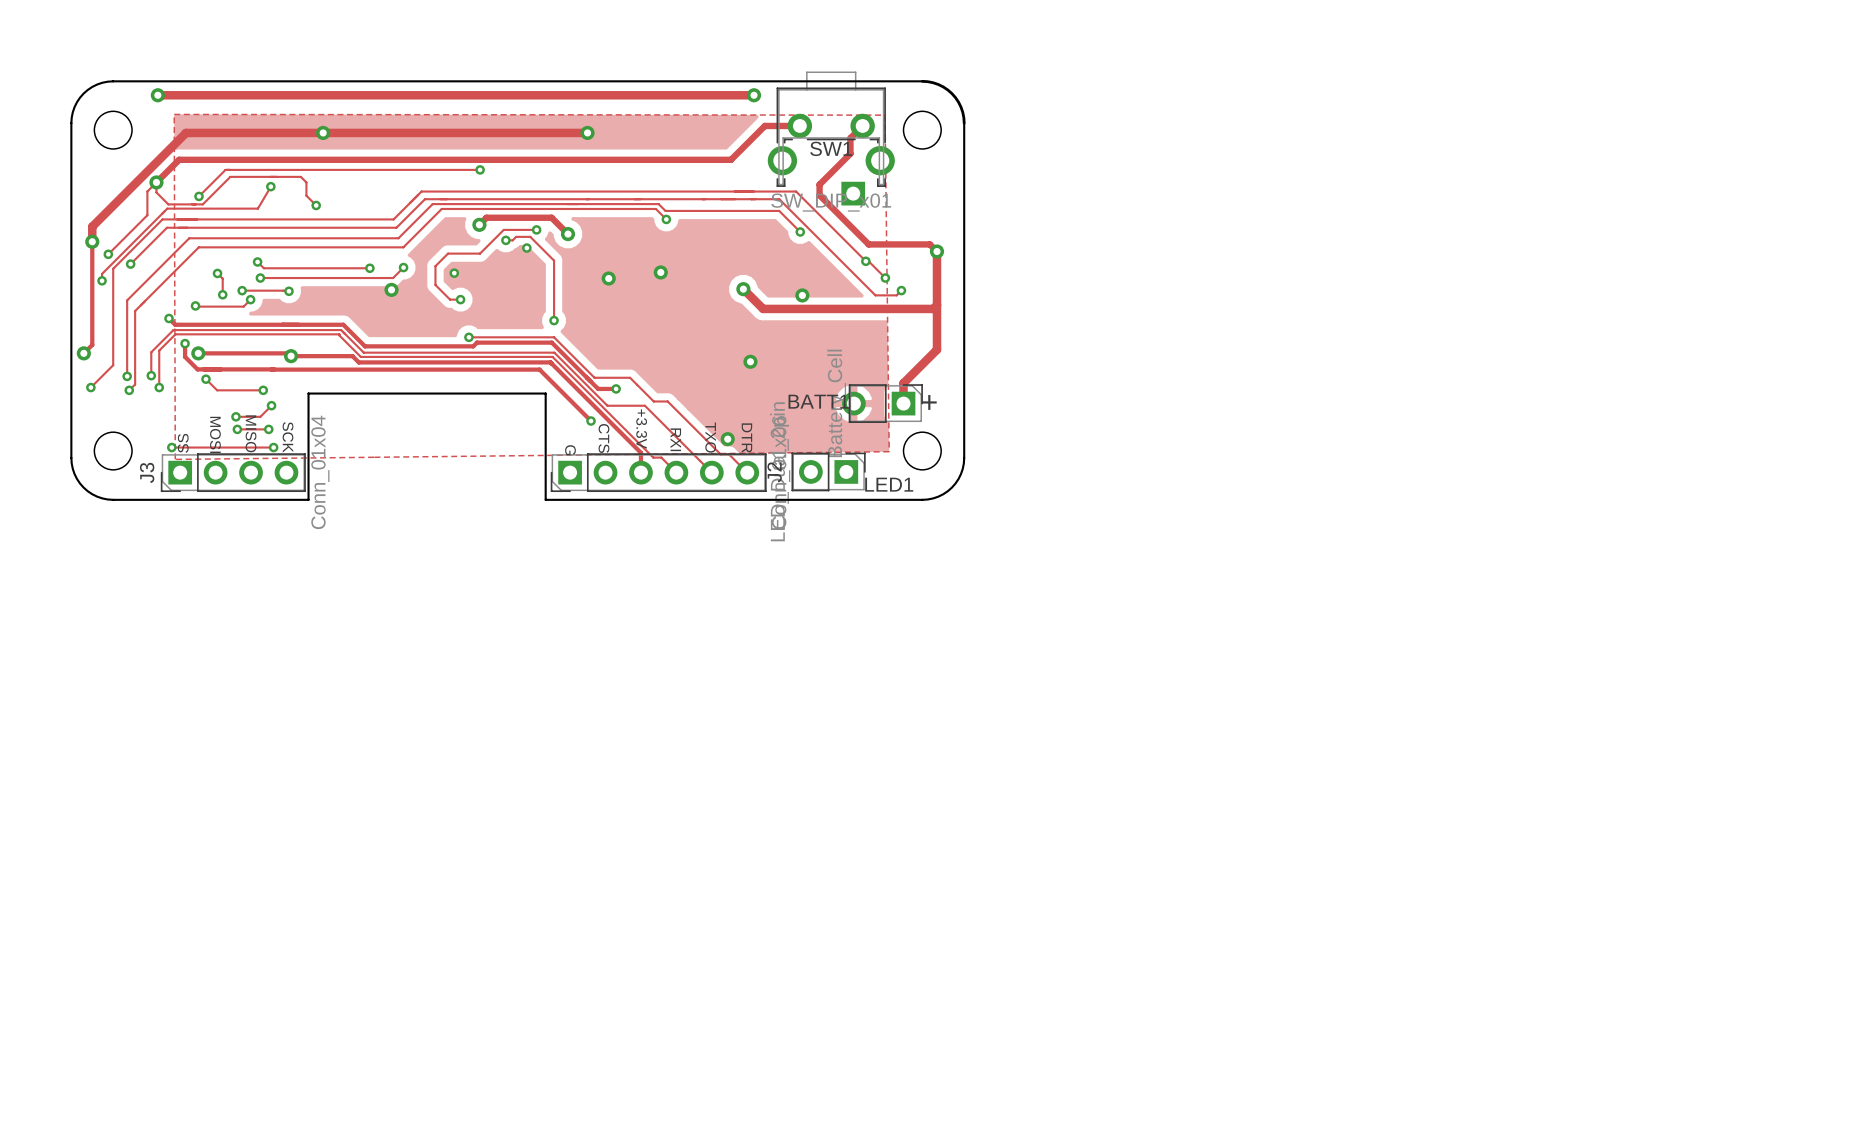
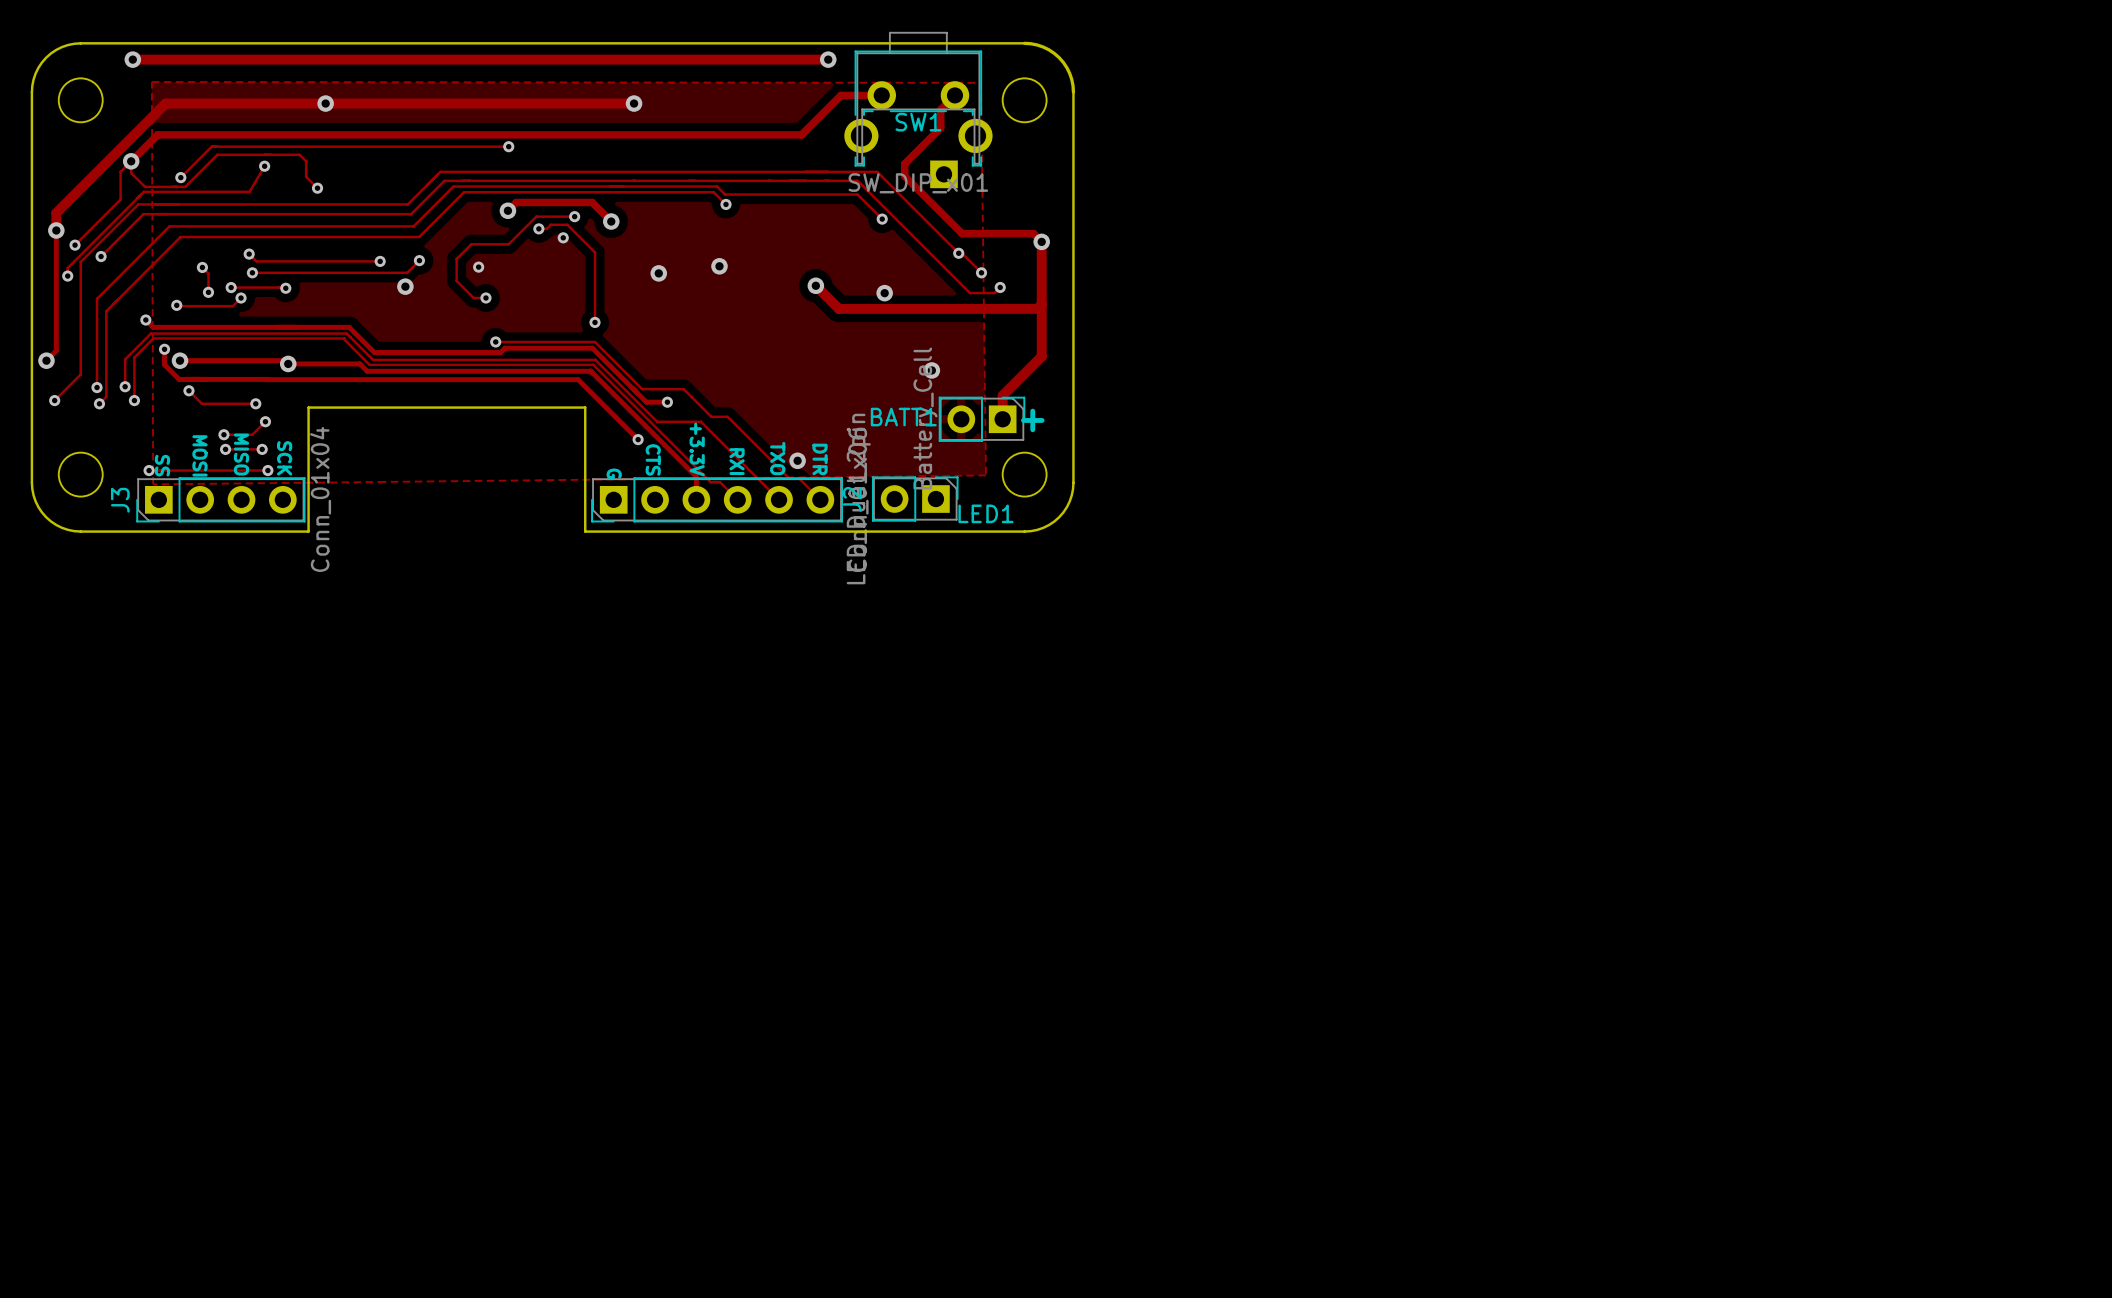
via: (750, 361) -> none
via: none -> (931, 370)
BATT1 footprint: [842, 384, 923, 423] -> [938, 396, 1026, 442]

